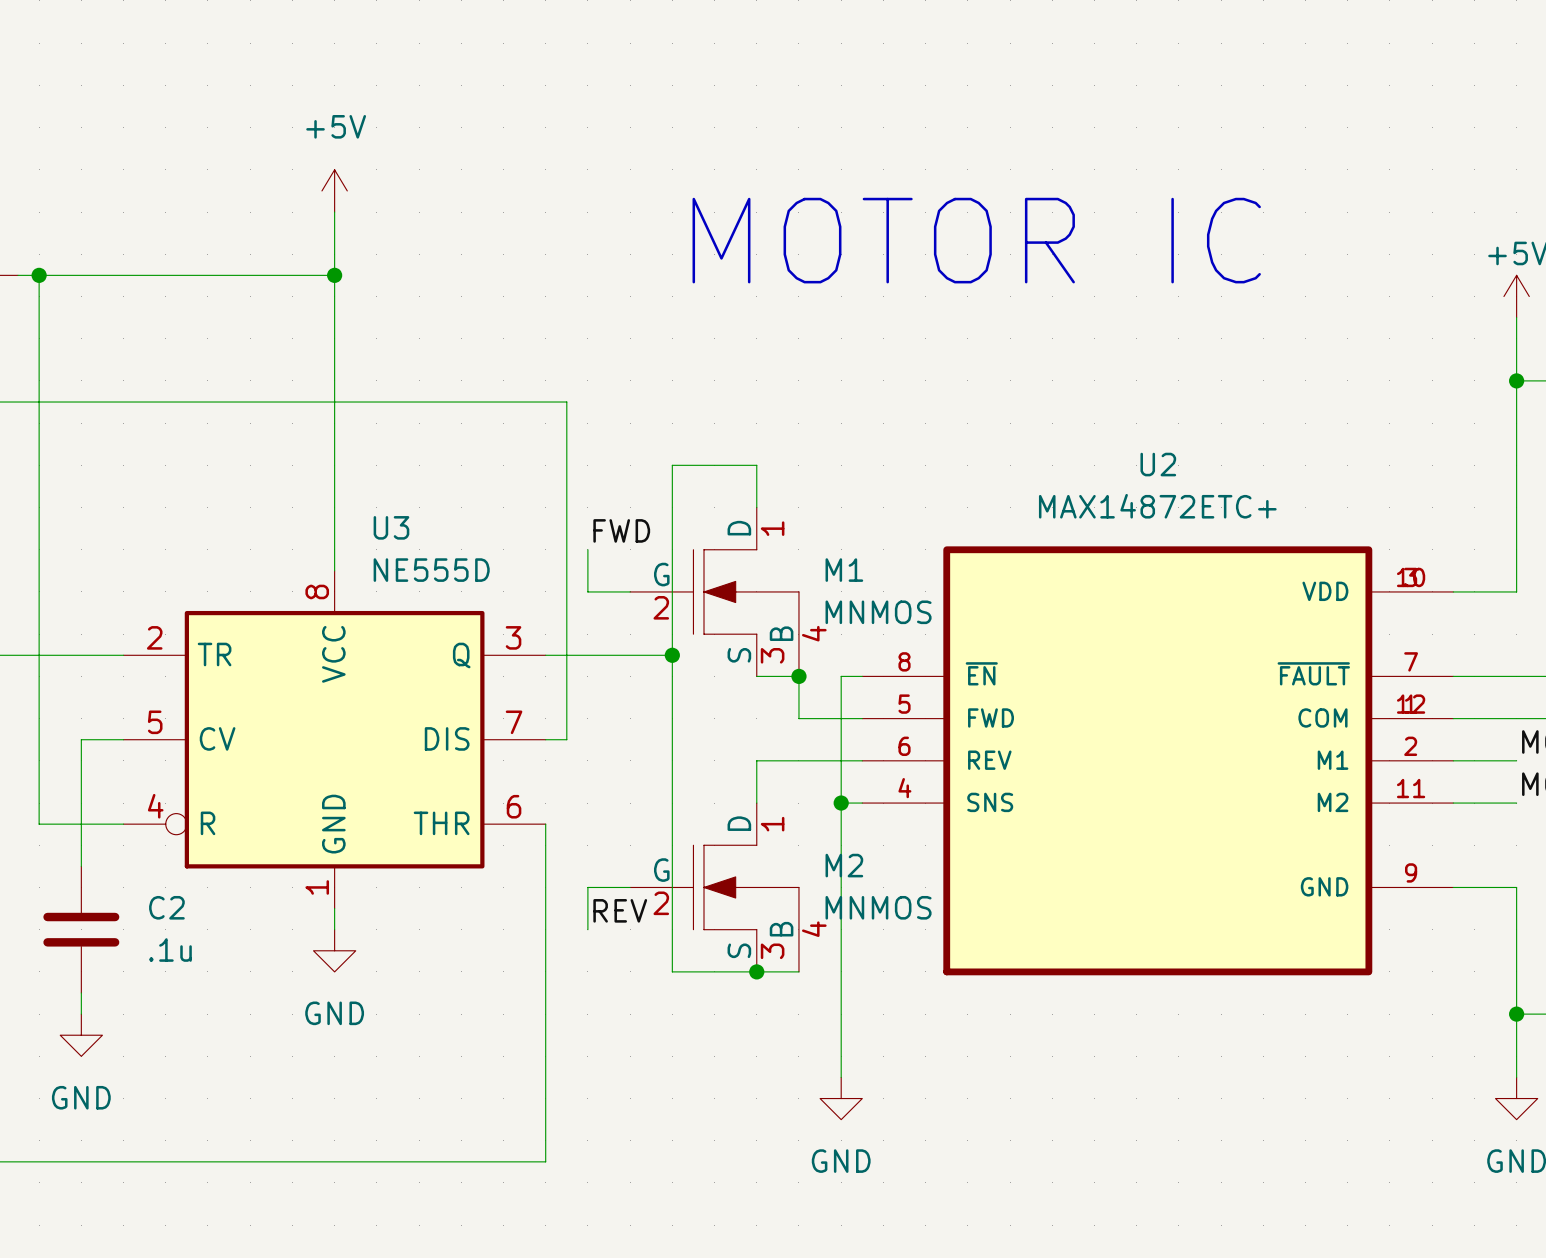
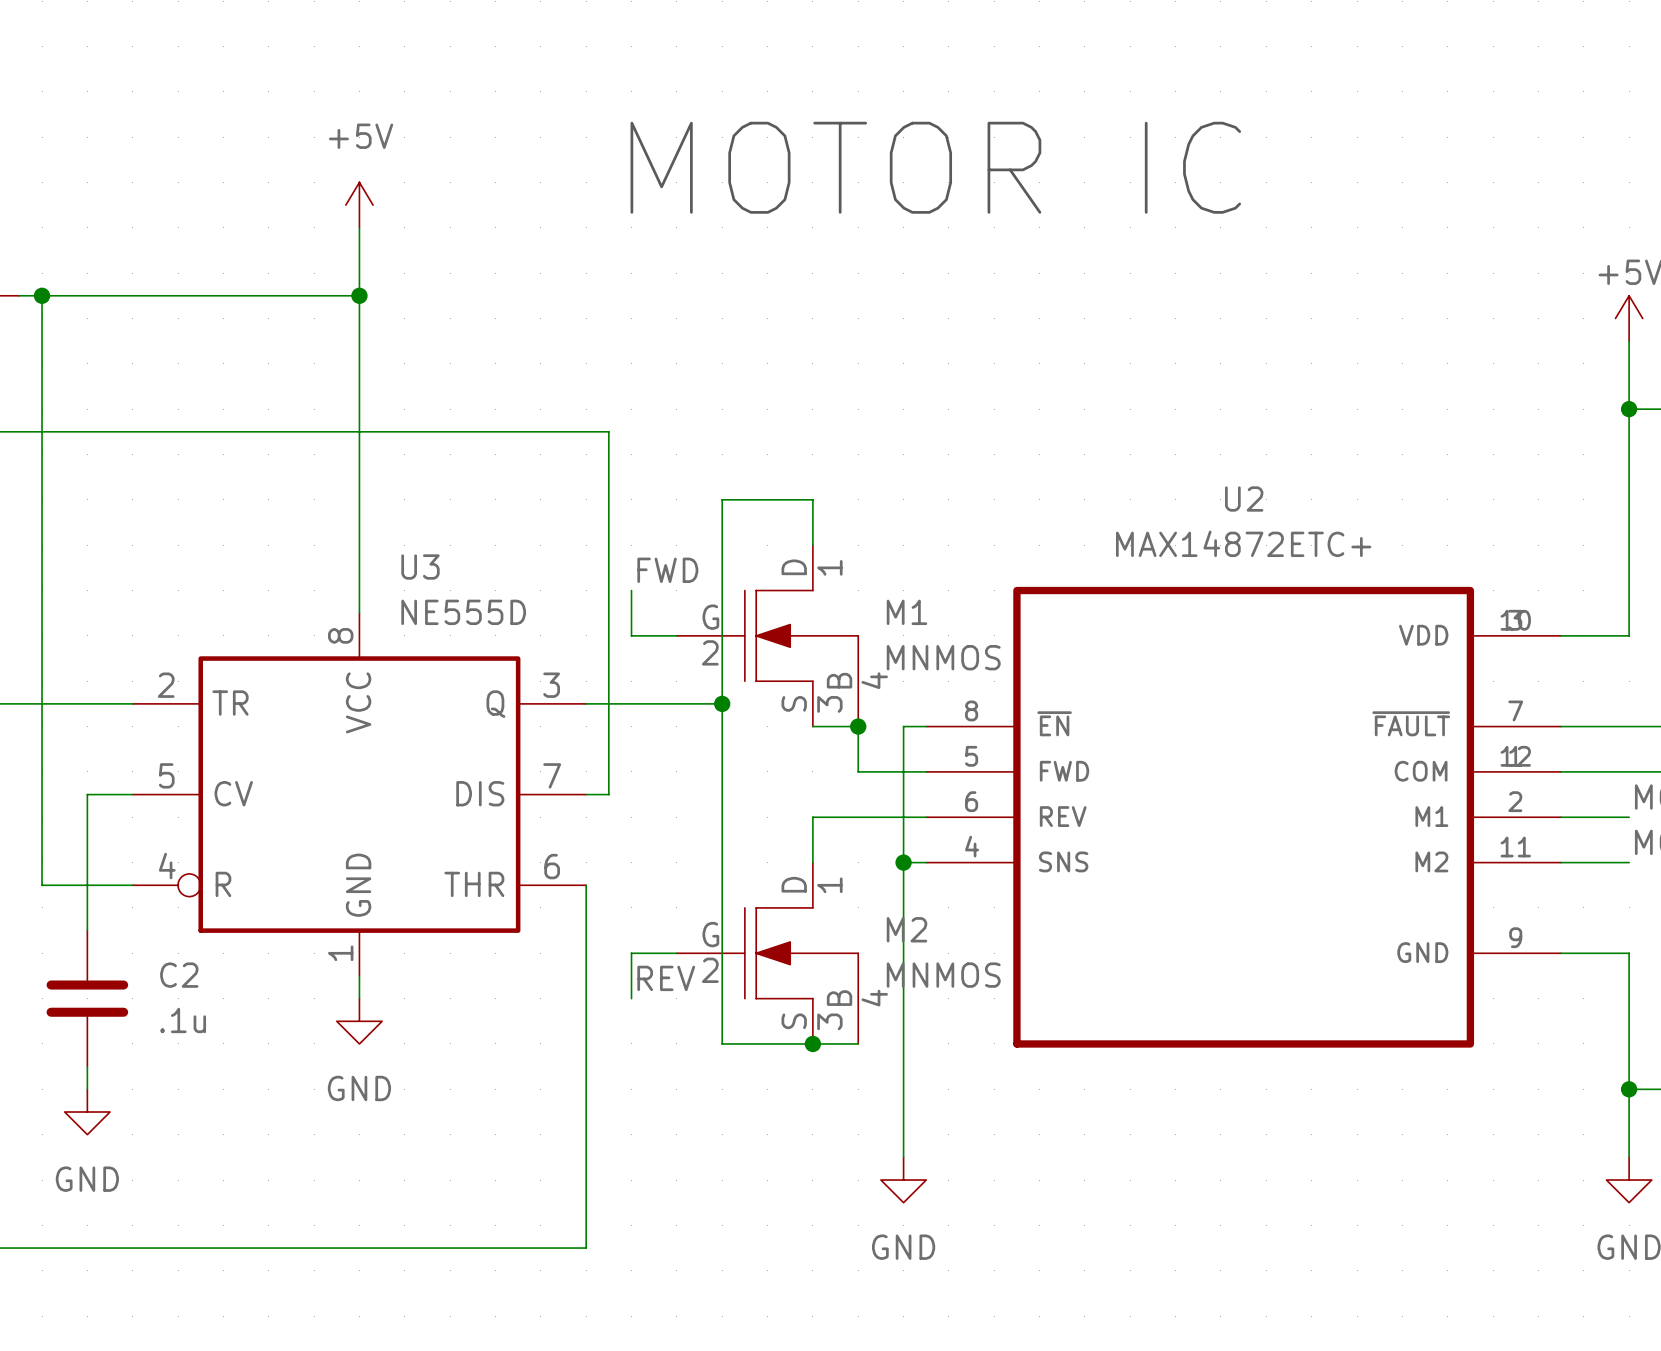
text position: MOTOR IC (976, 240) -> MOTOR IC (935, 167)

